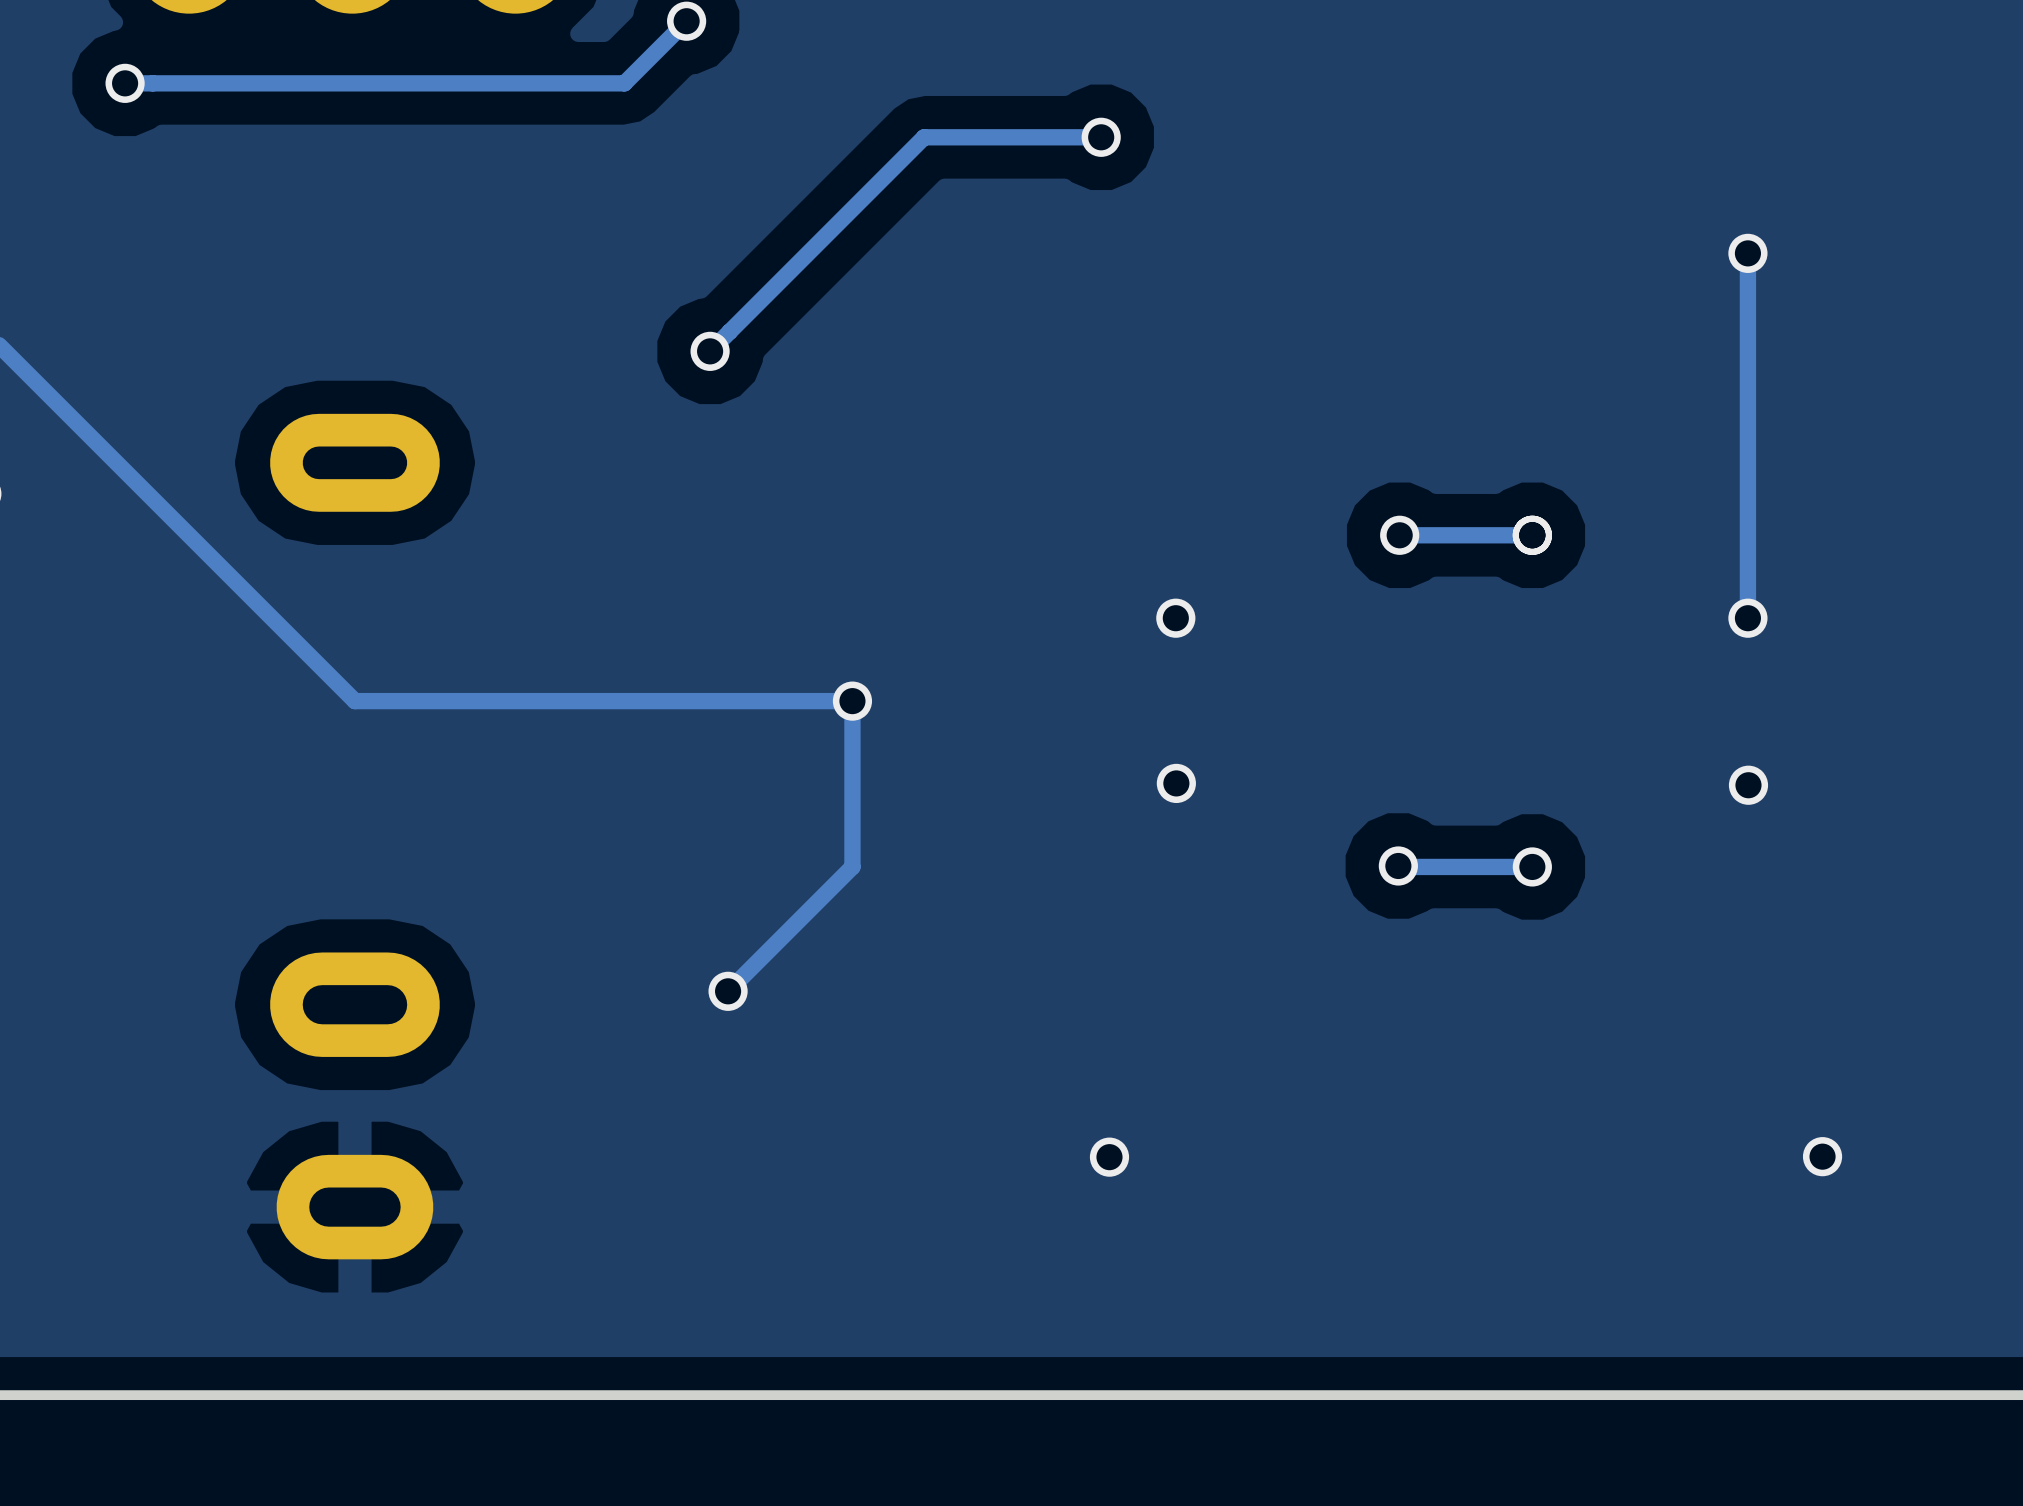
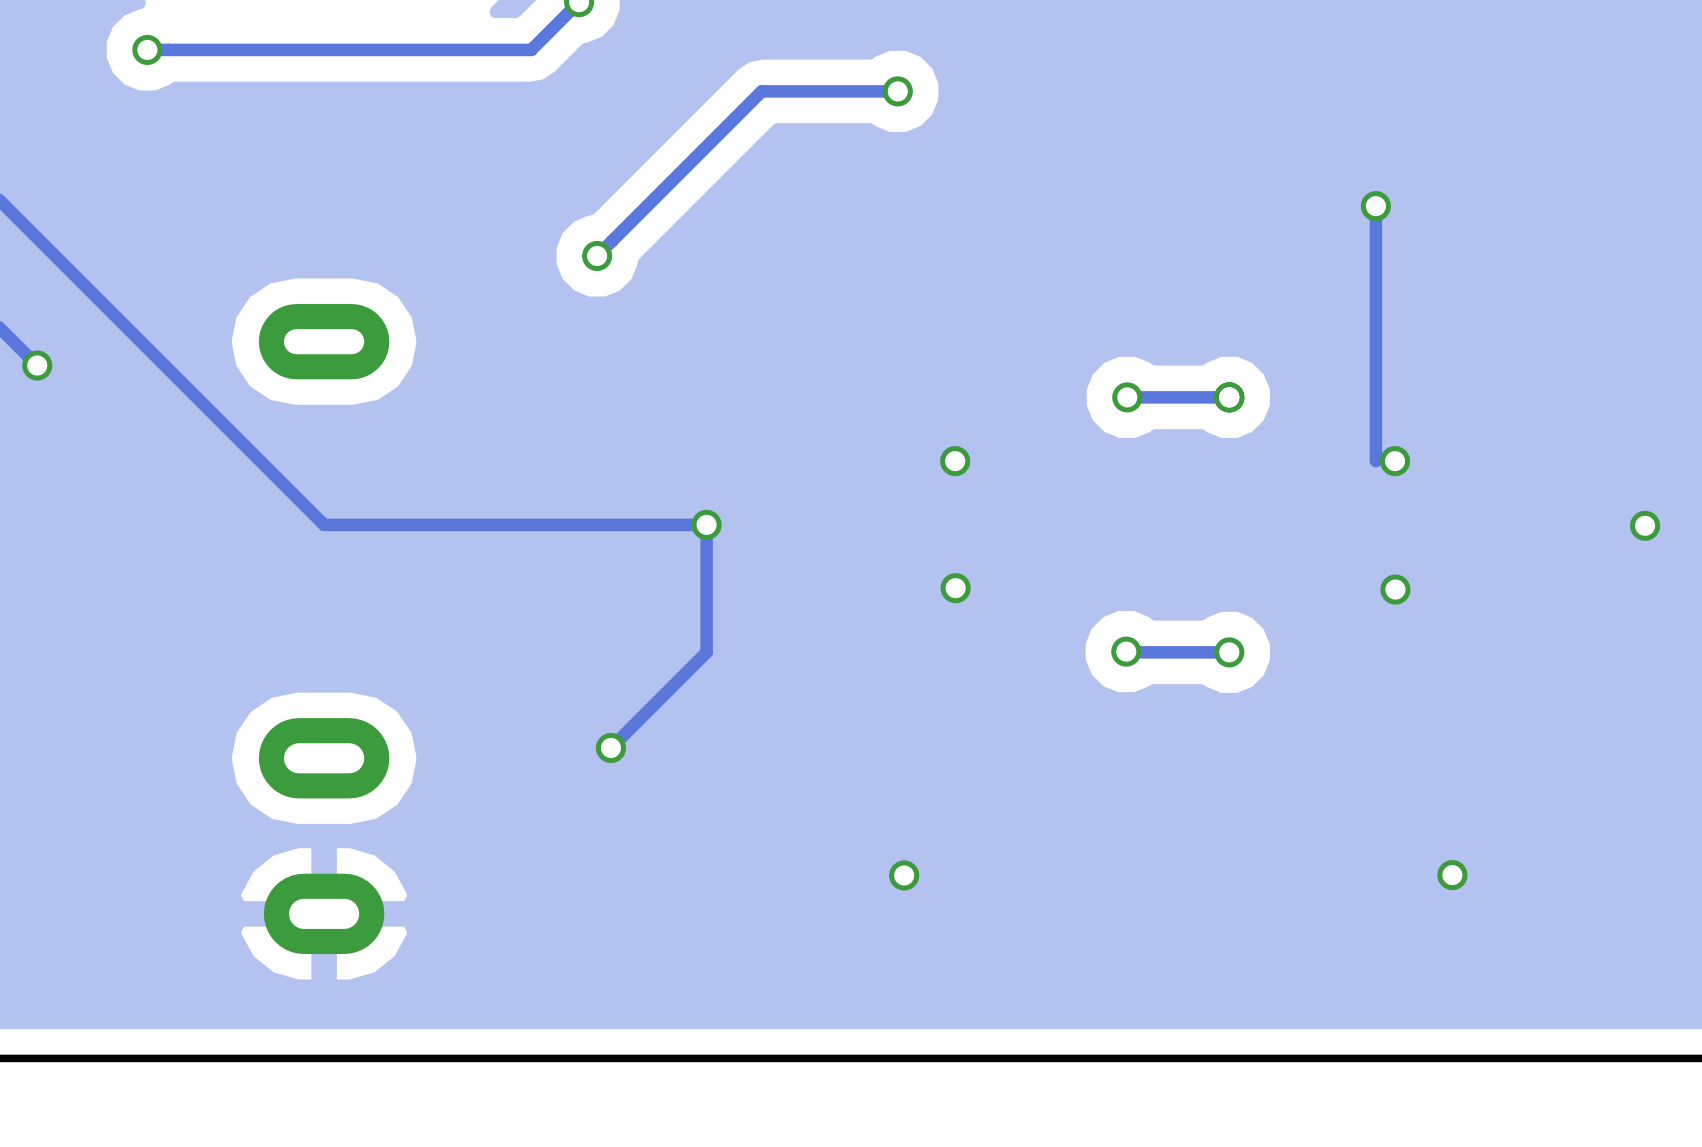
track: (1747, 253) (1747, 618) -> none
via position: (1747, 253) -> (1375, 206)
track: none -> (1375, 206) (1375, 461)

